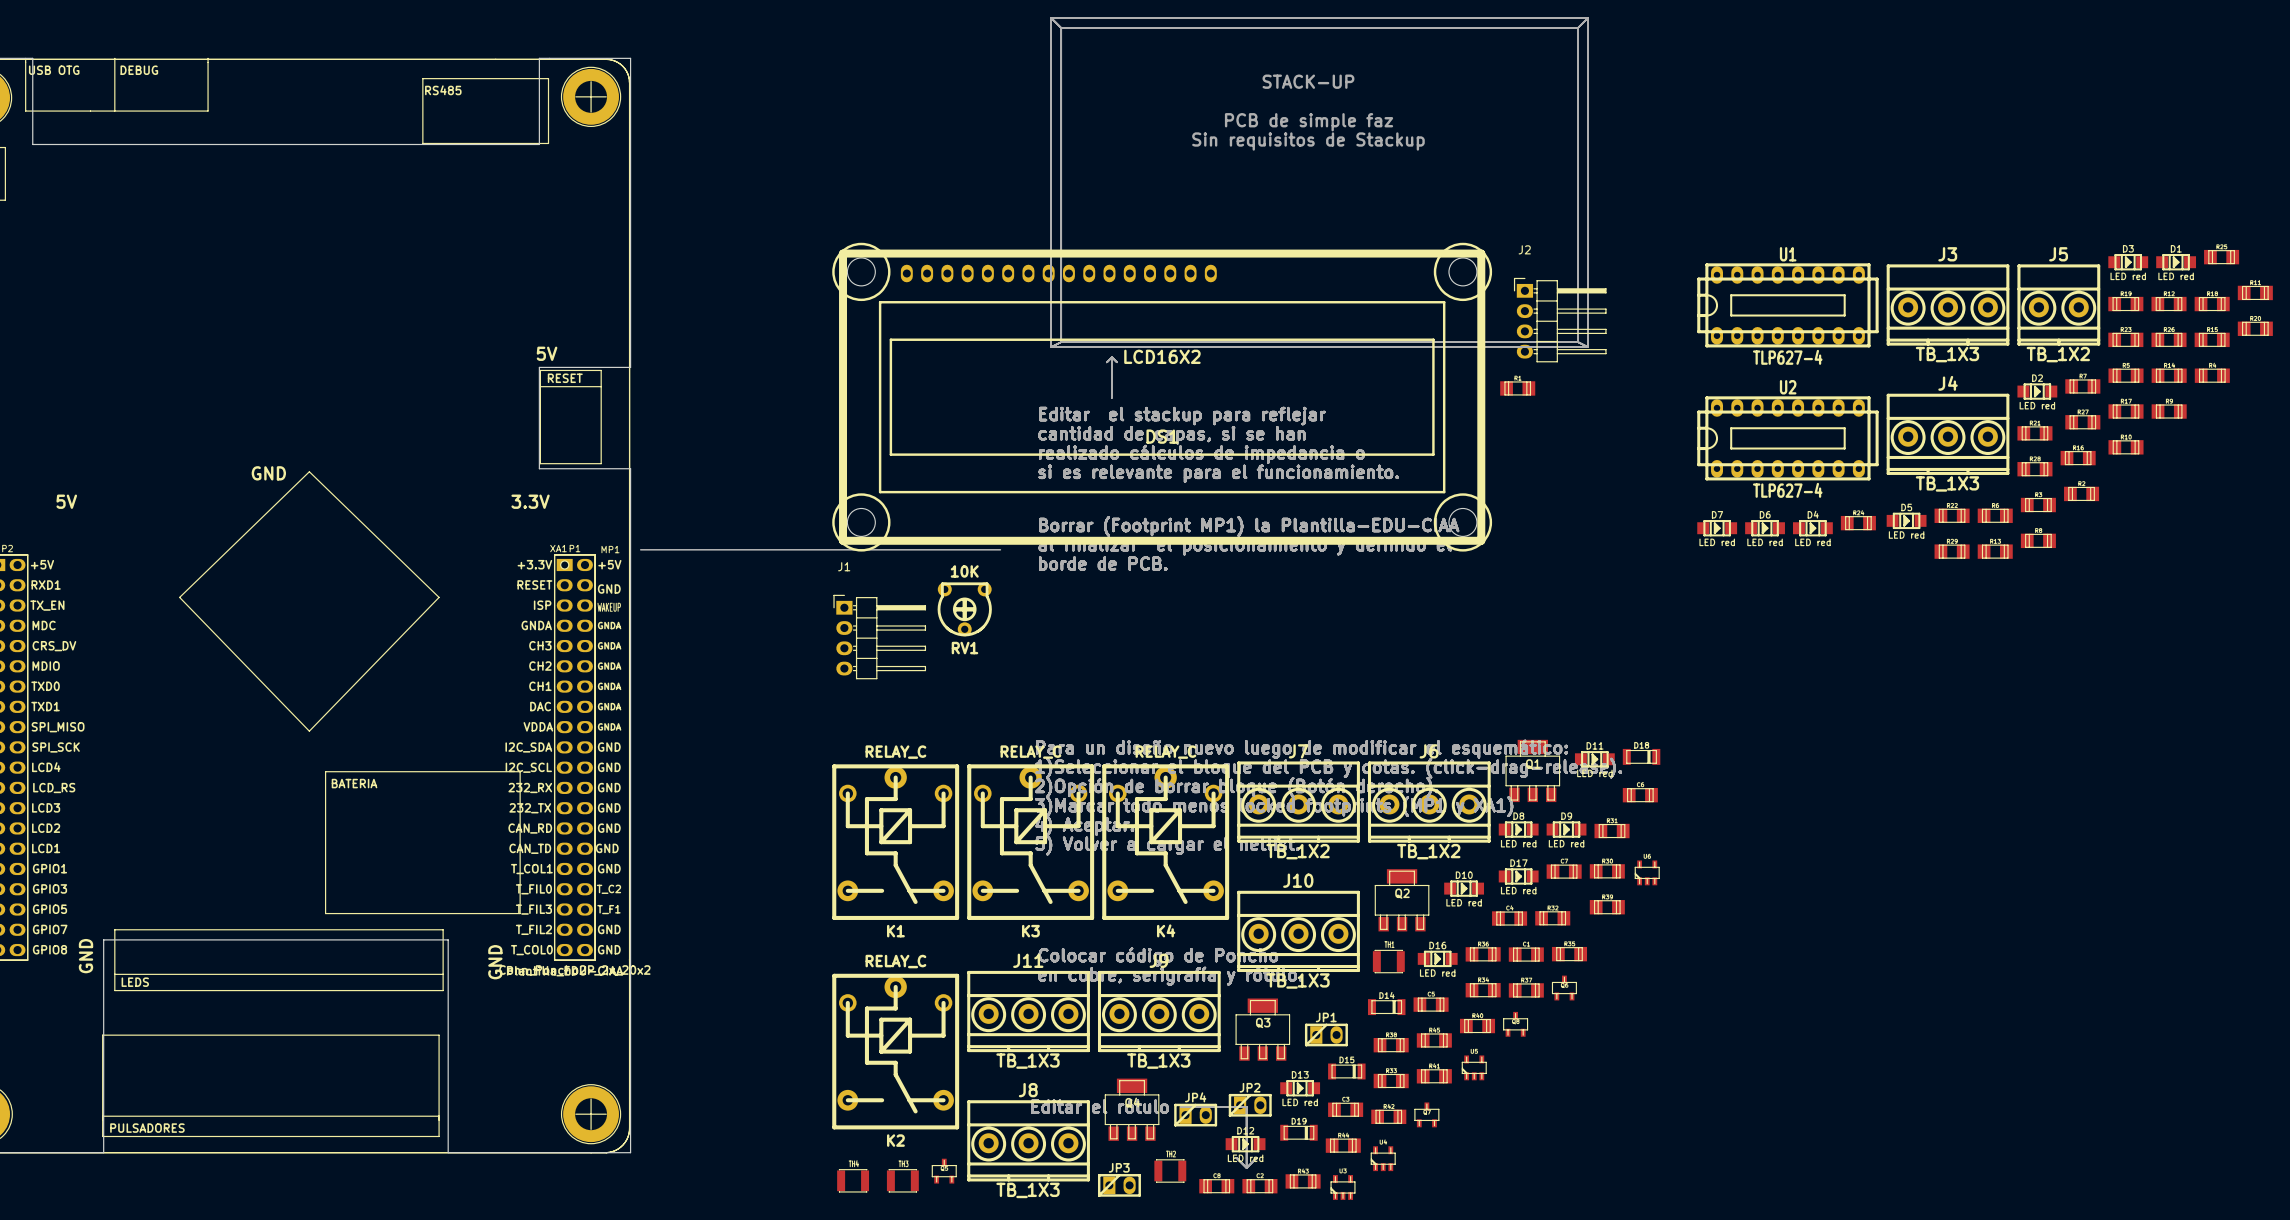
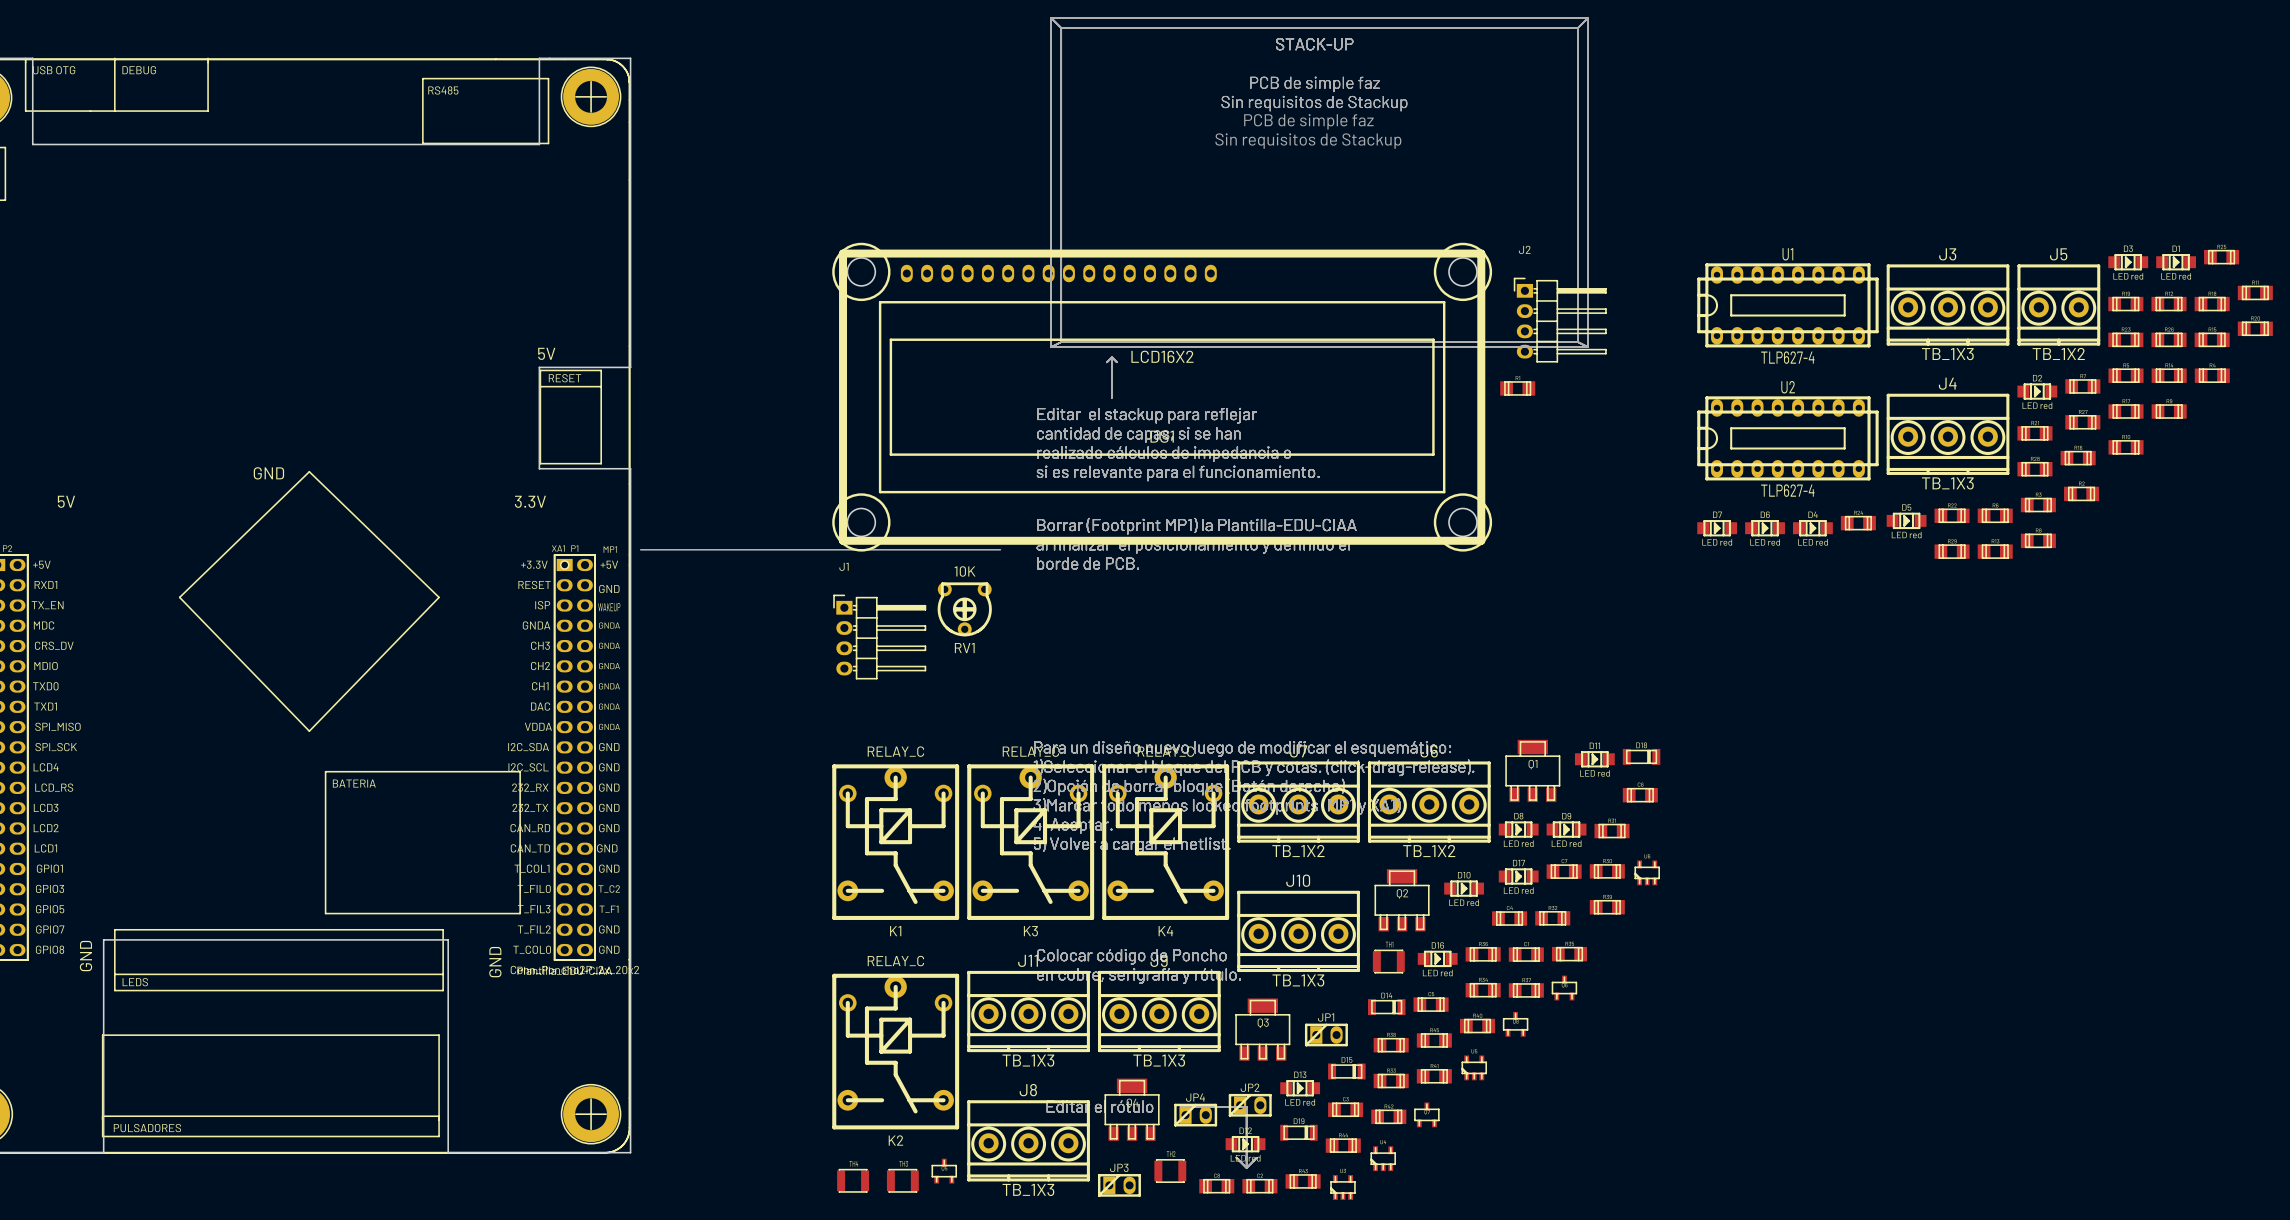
text position: STACK-UP (1308, 81) -> STACK-UP (1314, 44)
text: none -> PCB de simple faz (1314, 84)
text: none -> Sin requisitos de Stackup (1314, 103)

